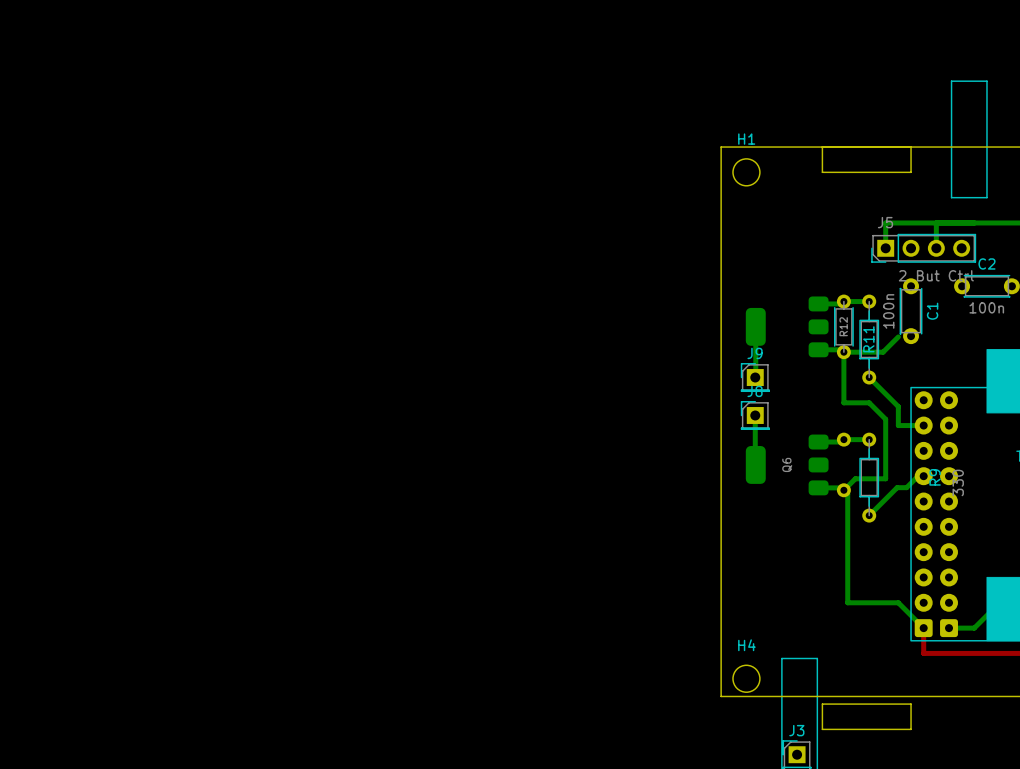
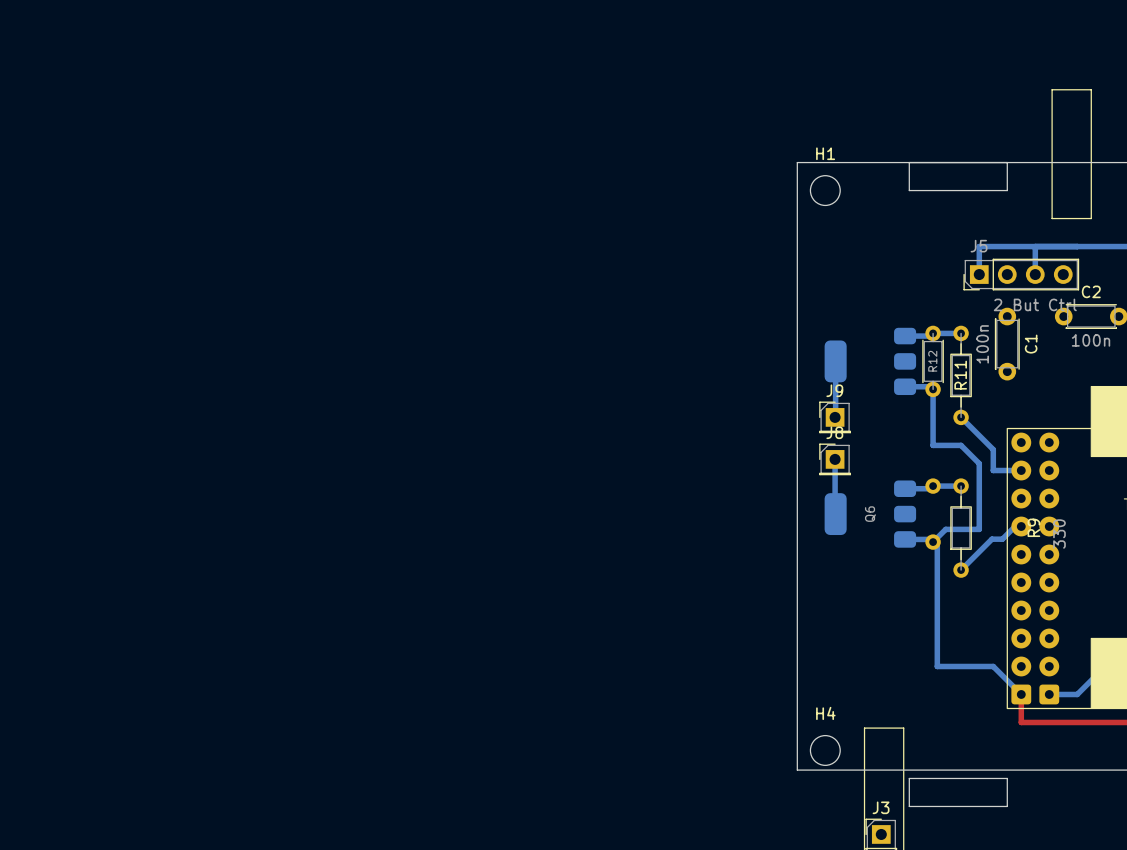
bottom track: (898, 336) (883, 352) (843, 352) -> none

